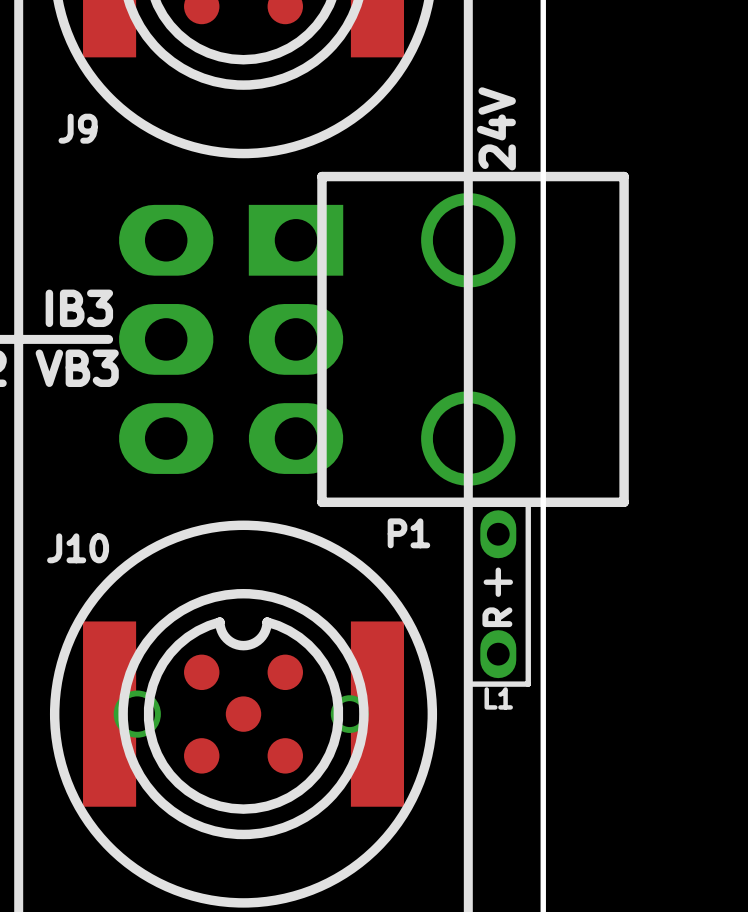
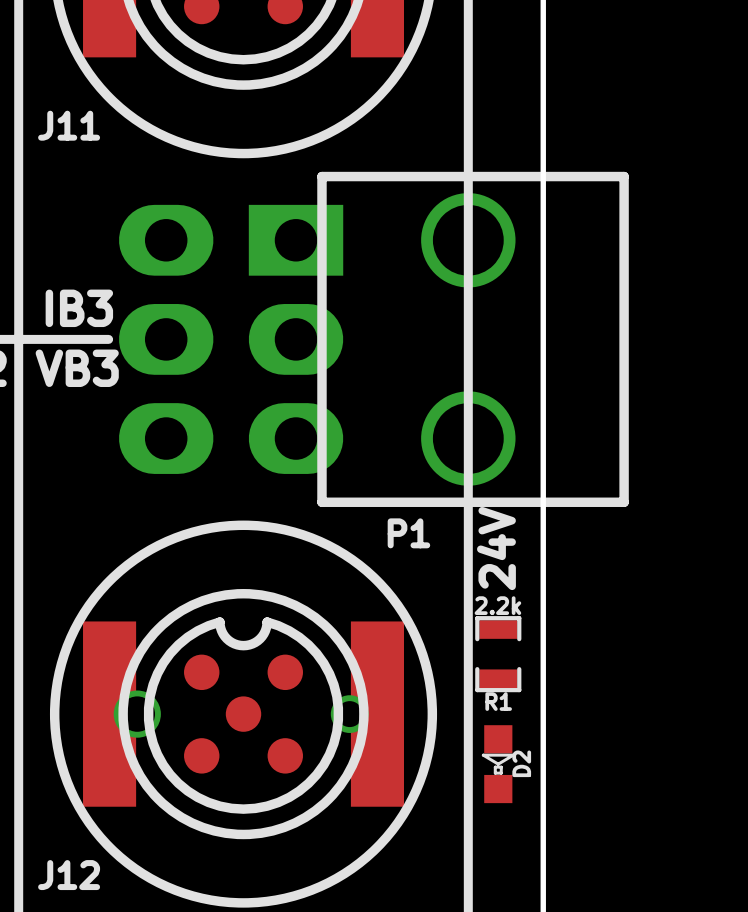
J9 name: J9 (78, 128) -> J11 (69, 125)
text position: 24V (496, 128) -> 24V (496, 548)
J10 name: J10 (78, 548) -> J12 (69, 875)
L1: (498, 594) -> none
R1: none -> 2.2k (498, 654)
D2: none -> (498, 764)

